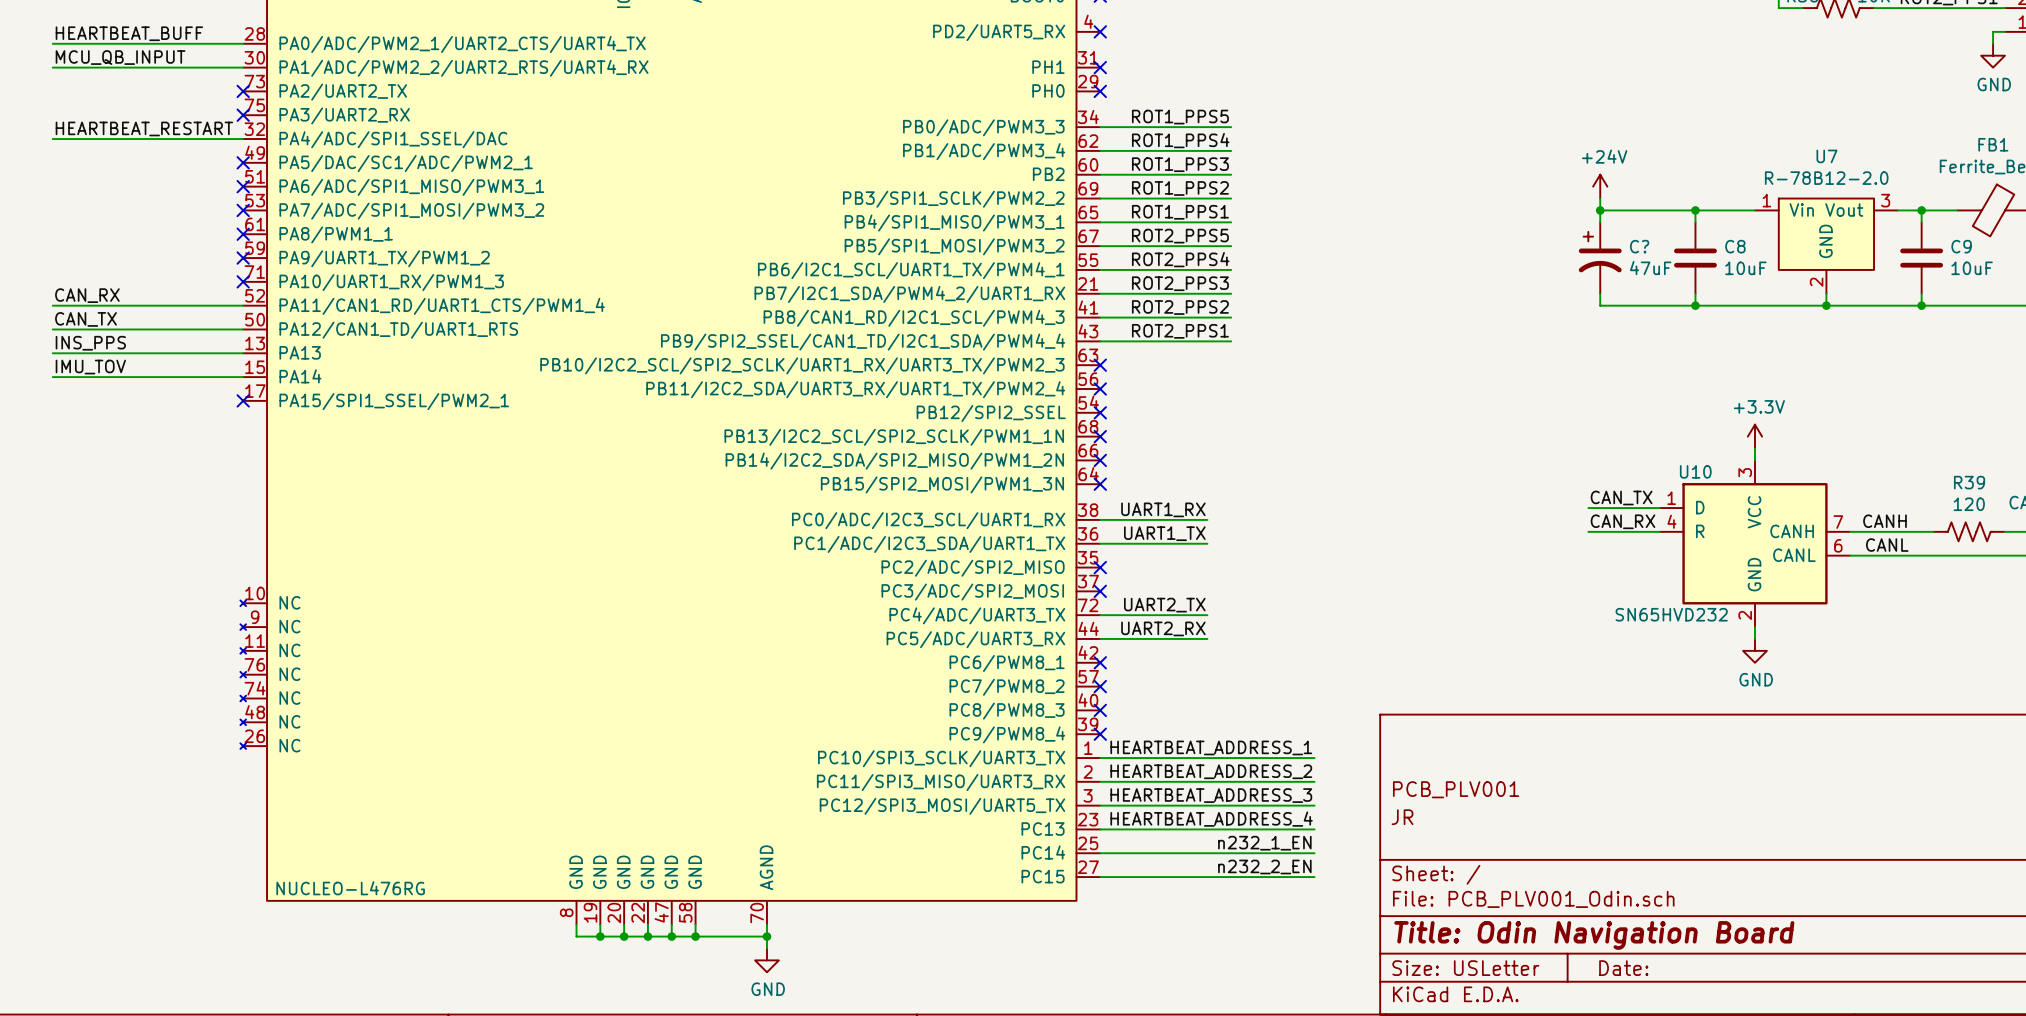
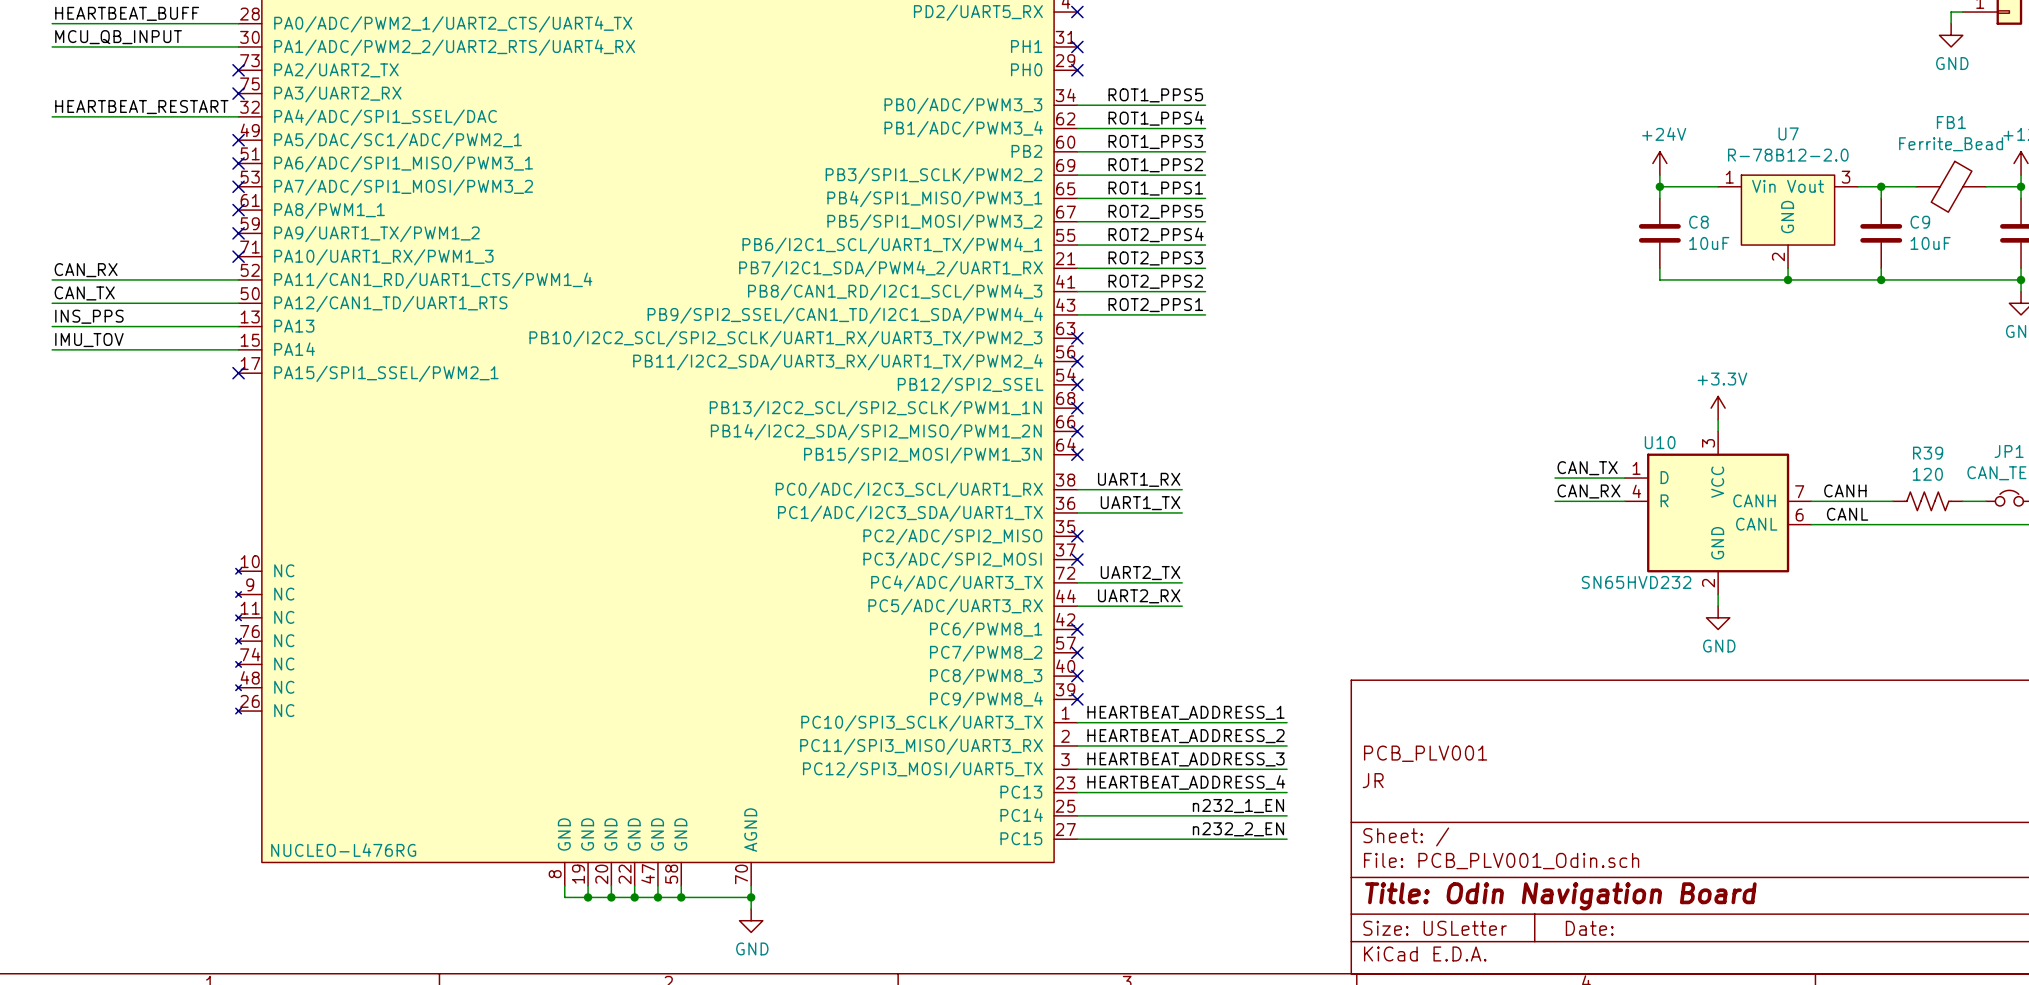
power symbol position: +24V (1600, 186) -> +24V (1659, 163)
wire: (1600, 198) (1600, 222) -> none
wire: (1600, 210) (1695, 210) -> (1659, 175) (1659, 186)
junction: (1600, 210) -> none
C?: 47uF (1600, 258) -> none
wire: (1600, 293) (1600, 305) (1695, 305) -> none
junction: (1695, 305) -> none

